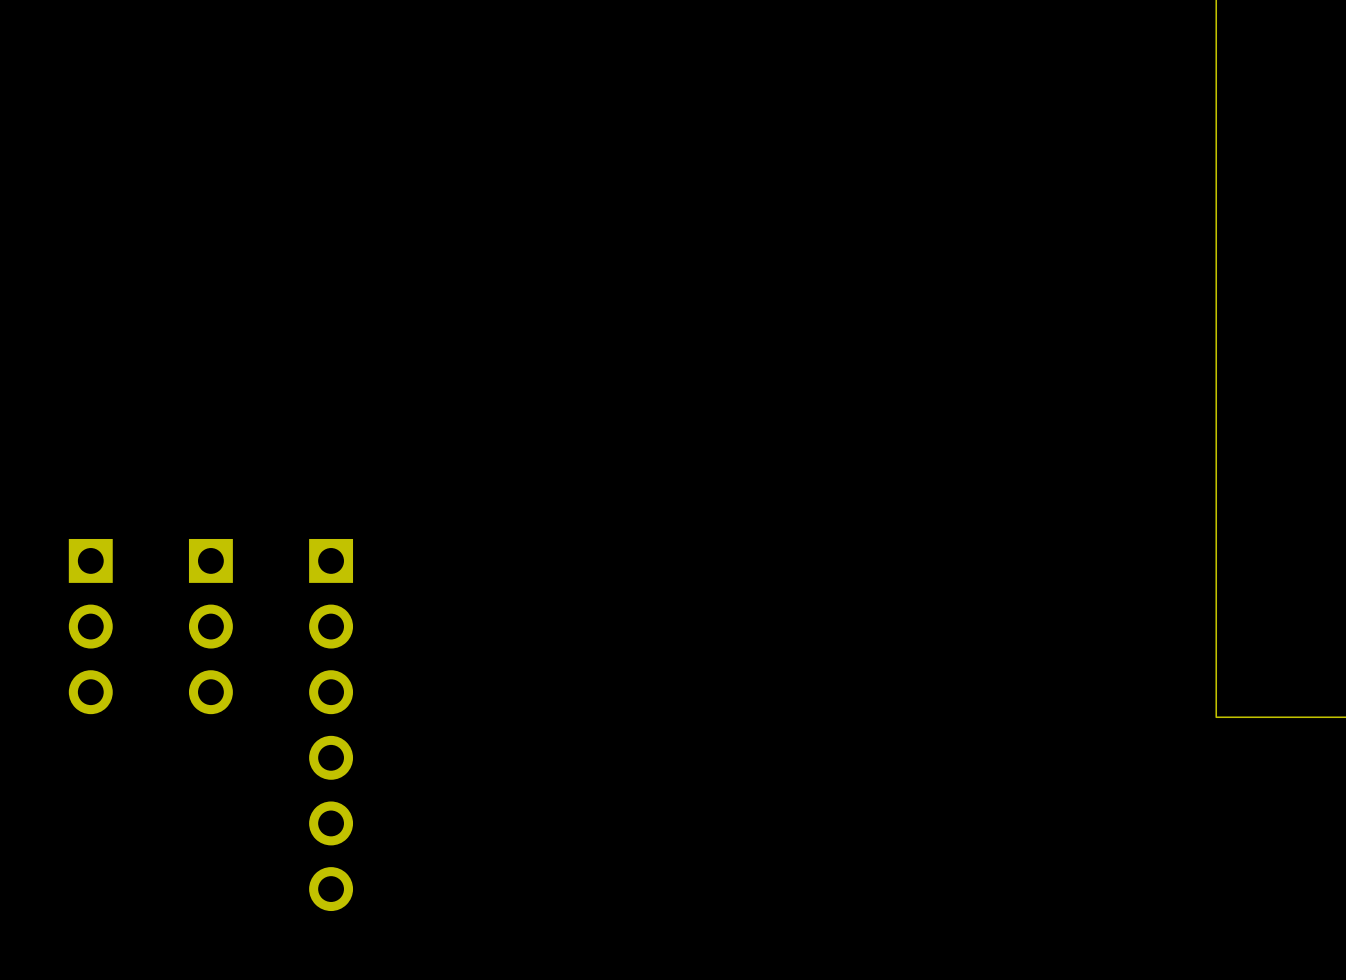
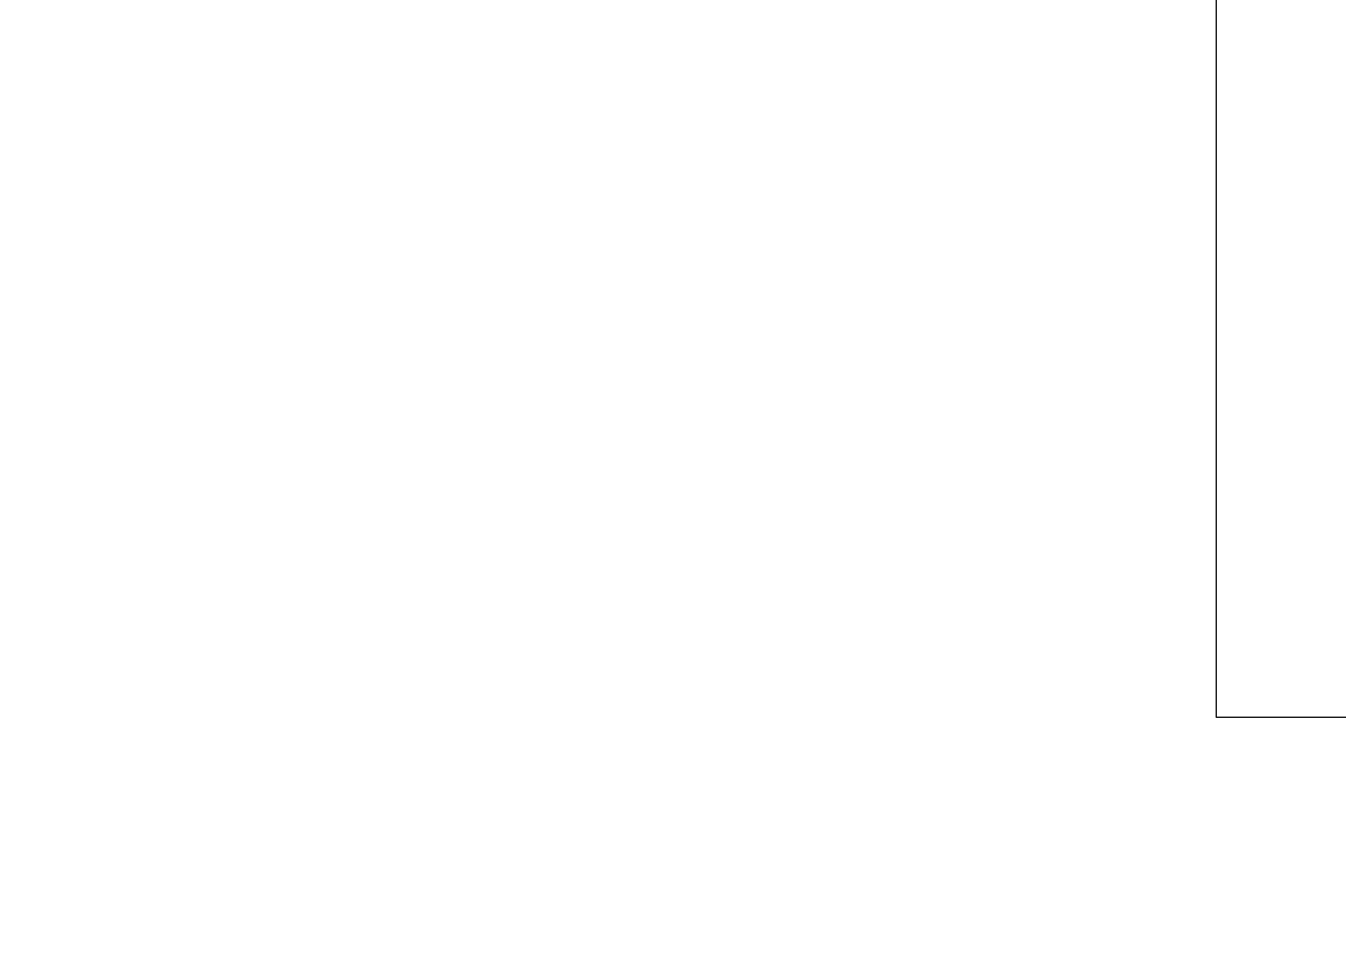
part: (90, 626) -> none
part: (210, 626) -> none
part: (331, 725) -> none

